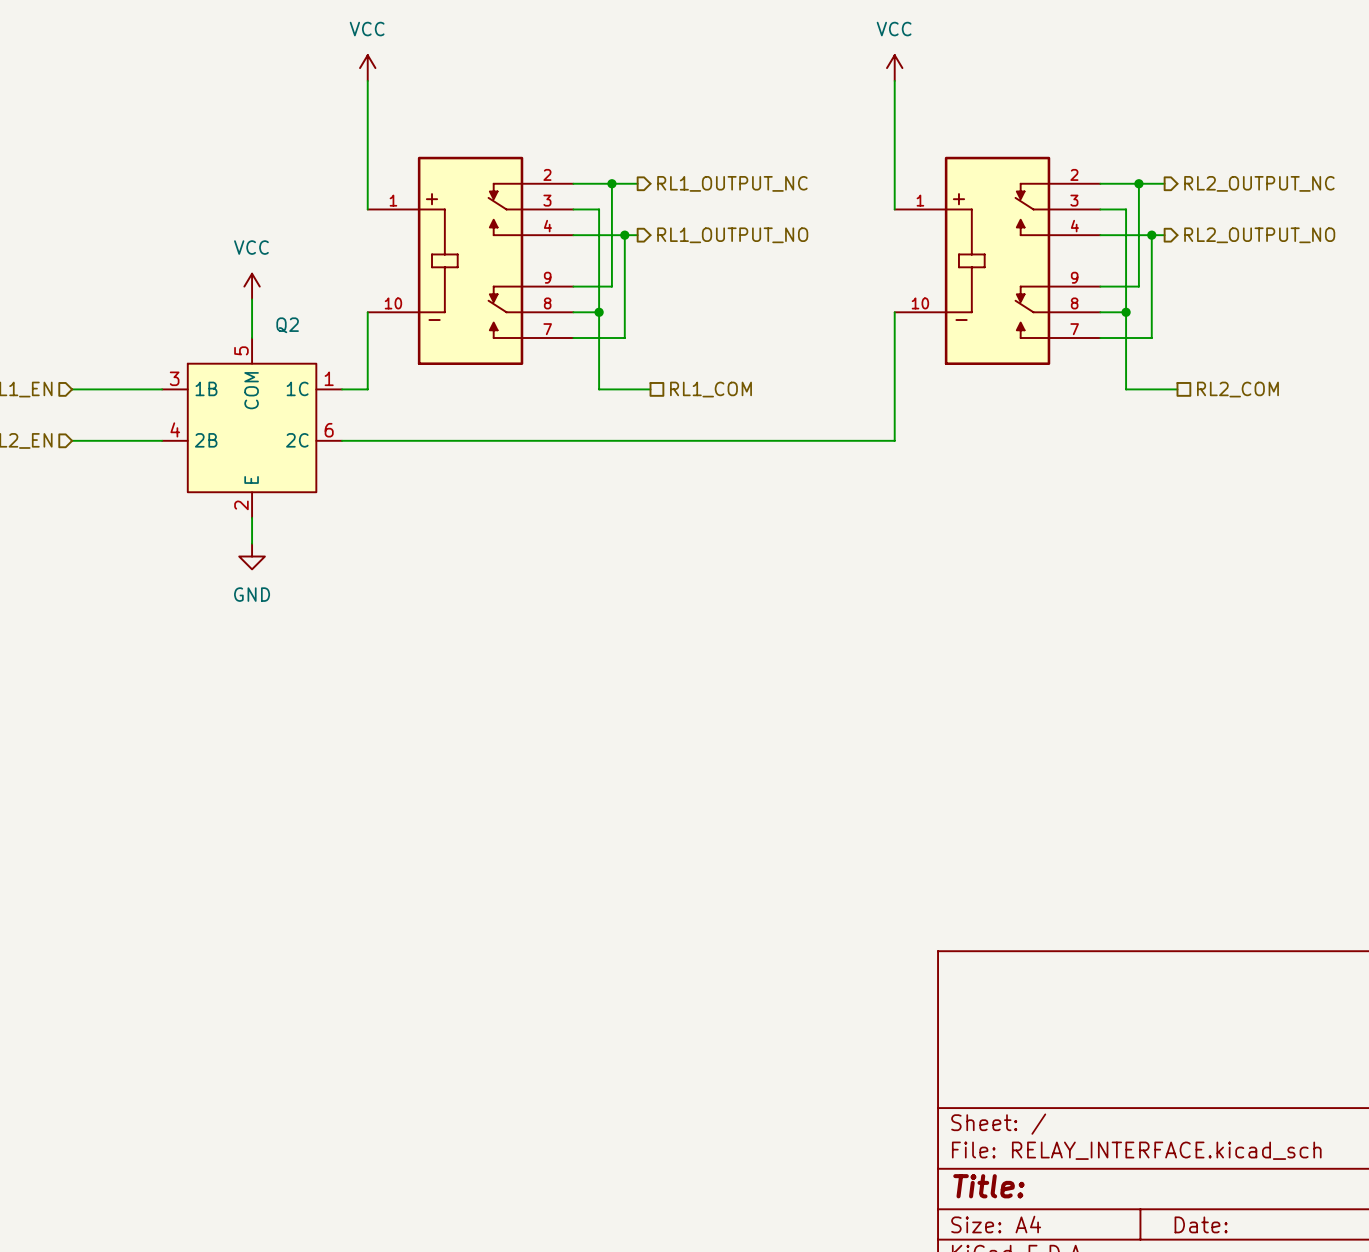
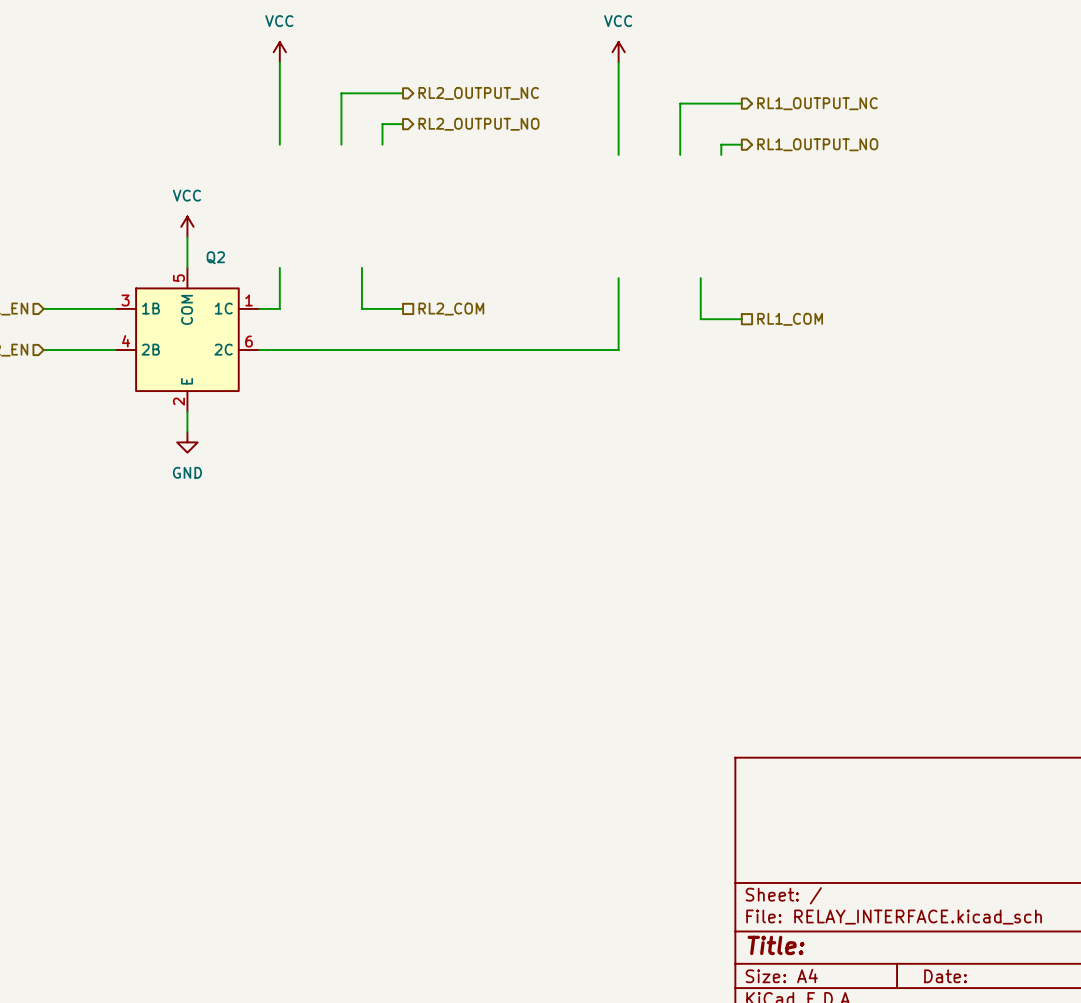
power symbol position: VCC (894, 68) -> VCC (618, 52)
wire: none -> (618, 62) (618, 154)
wire: (894, 80) (894, 209) -> none
wire: none -> (403, 93) (341, 93) (341, 144)
hierarchical label: none -> RL2_OUTPUT_NC (478, 93)
wire: none -> (741, 103) (680, 103) (680, 154)
hierarchical label: none -> RL1_OUTPUT_NC (817, 103)
wire: (367, 183) (367, 209) -> none
wire: (573, 183) (637, 183) -> none
wire: (611, 183) (611, 286) (573, 286) -> none
junction: (611, 183) -> none
hierarchical label: RL1_OUTPUT_NC (732, 183) -> RL2_OUTPUT_NO (478, 124)
wire: none -> (741, 144) (721, 144) (721, 154)
hierarchical label: none -> RL1_OUTPUT_NO (817, 144)
wire: (1100, 183) (1164, 183) -> none
wire: (1138, 183) (1138, 286) (1100, 286) -> none
junction: (1138, 183) -> none
hierarchical label: RL2_OUTPUT_NC (1259, 183) -> none
wire: (573, 209) (599, 209) (599, 389) (650, 389) -> none
wire: (1100, 209) (1126, 209) (1126, 389) (1177, 389) -> none
wire: (573, 235) (637, 235) -> none
wire: (624, 235) (624, 338) (573, 338) -> none
junction: (624, 235) -> none
hierarchical label: RL1_OUTPUT_NO (732, 235) -> none
wire: (1100, 235) (1164, 235) -> none
wire: (1151, 235) (1151, 338) (1100, 338) -> none
junction: (1151, 235) -> none
hierarchical label: RL2_OUTPUT_NO (1259, 235) -> none
part: (470, 260) -> none
part: (997, 260) -> none
wire: (367, 312) (367, 338) -> none
wire: (573, 312) (599, 312) -> none
junction: (599, 312) -> none
wire: (894, 312) (894, 350) -> none
wire: (1100, 312) (1126, 312) -> none
junction: (1126, 312) -> none
wire: none -> (361, 267) (361, 308) (403, 308)
hierarchical label: none -> RL2_COM (451, 309)
hierarchical label: RL1_COM (710, 389) -> none
hierarchical label: RL2_COM (1237, 389) -> none
wire: (894, 402) (894, 440) (791, 440) -> (618, 278) (618, 350)
wire: none -> (700, 319) (741, 319)
hierarchical label: none -> RL1_COM (790, 319)

